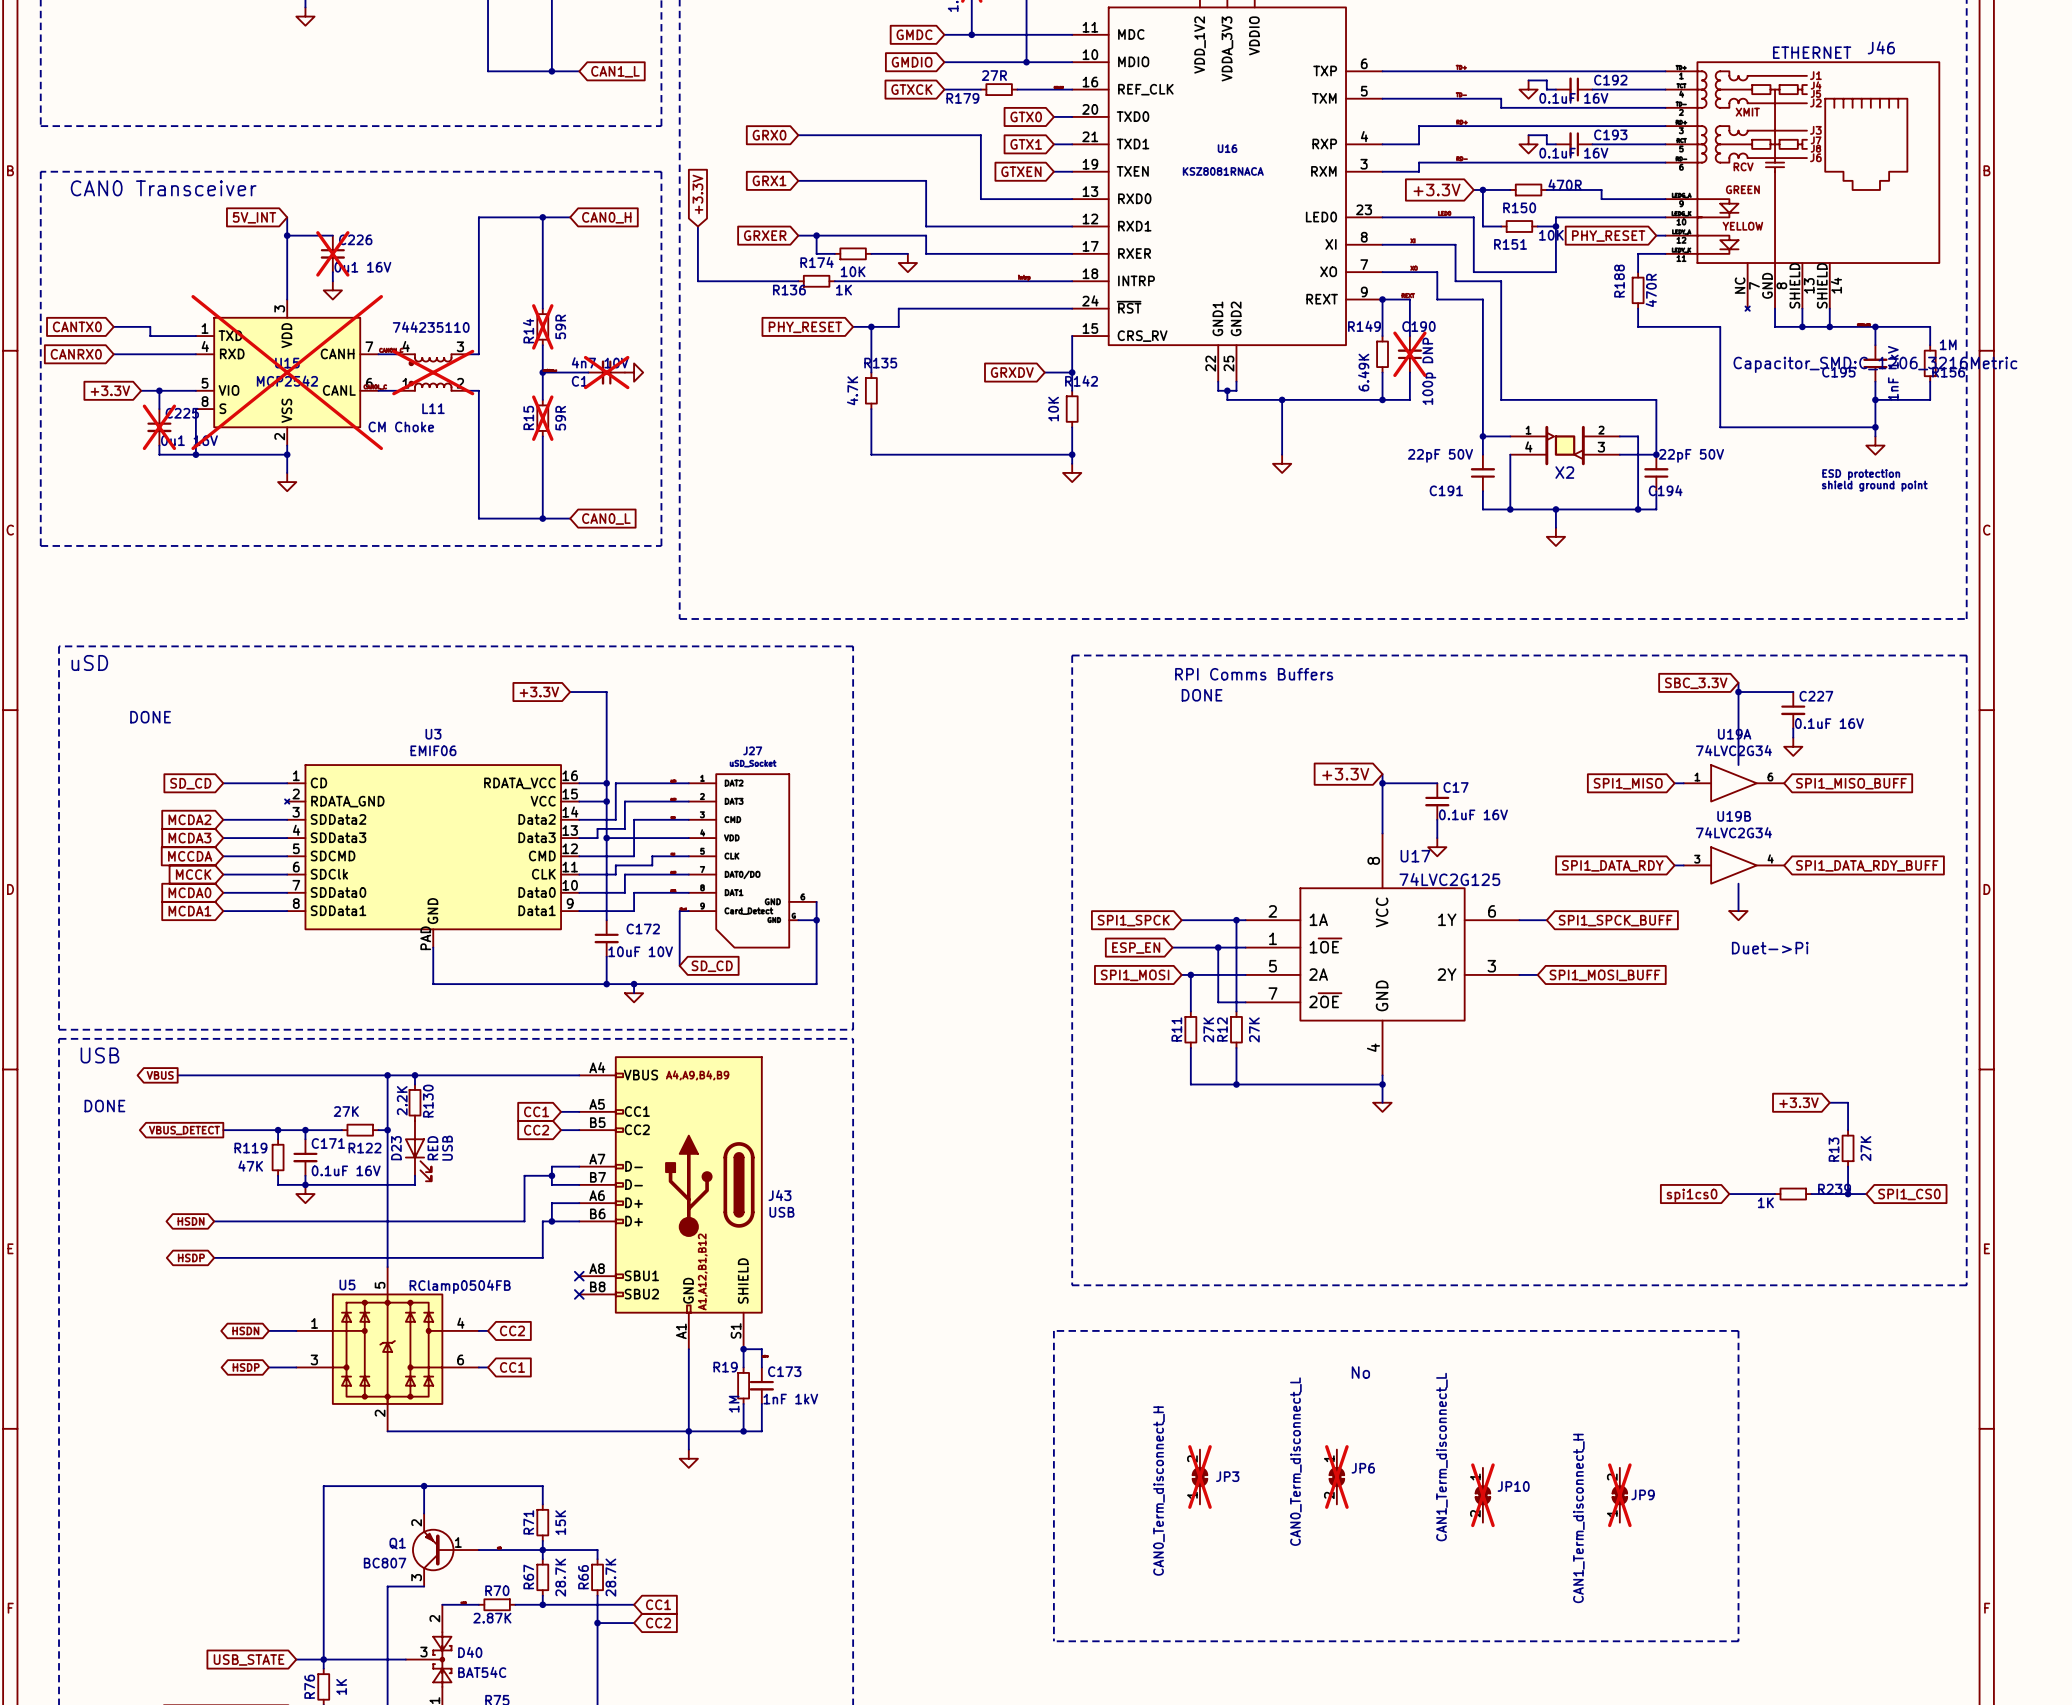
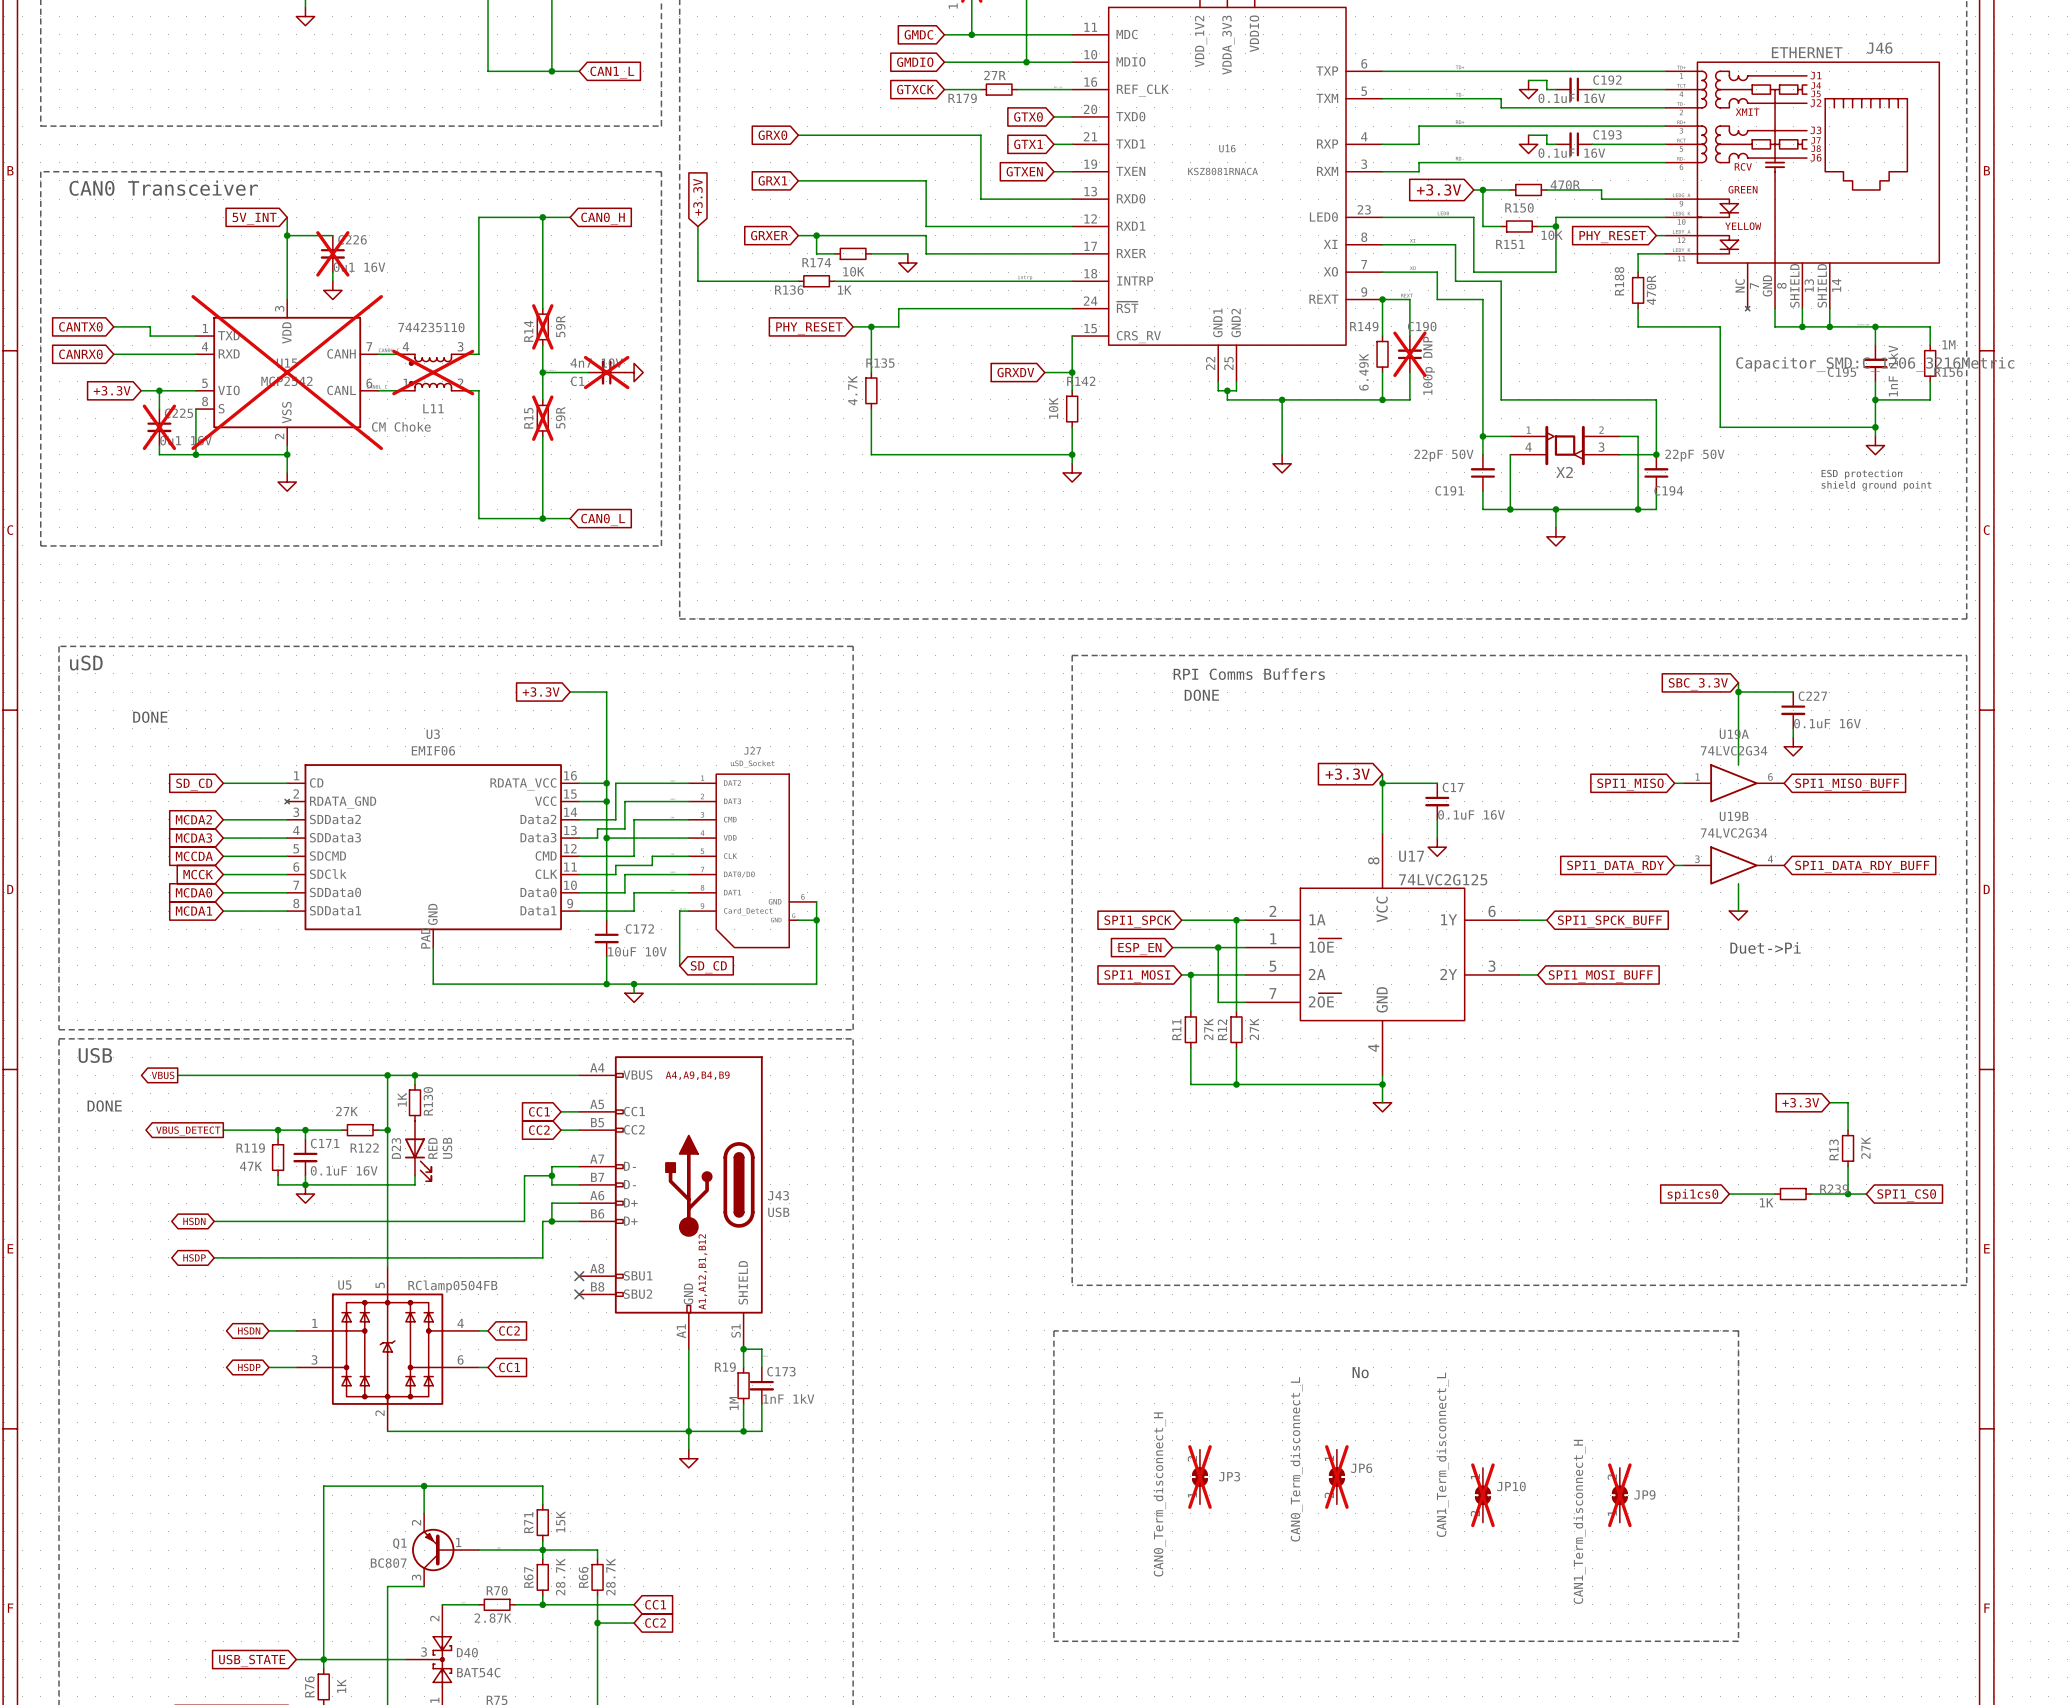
R130 value: 2.2K (402, 1100) -> 1K (402, 1099)

